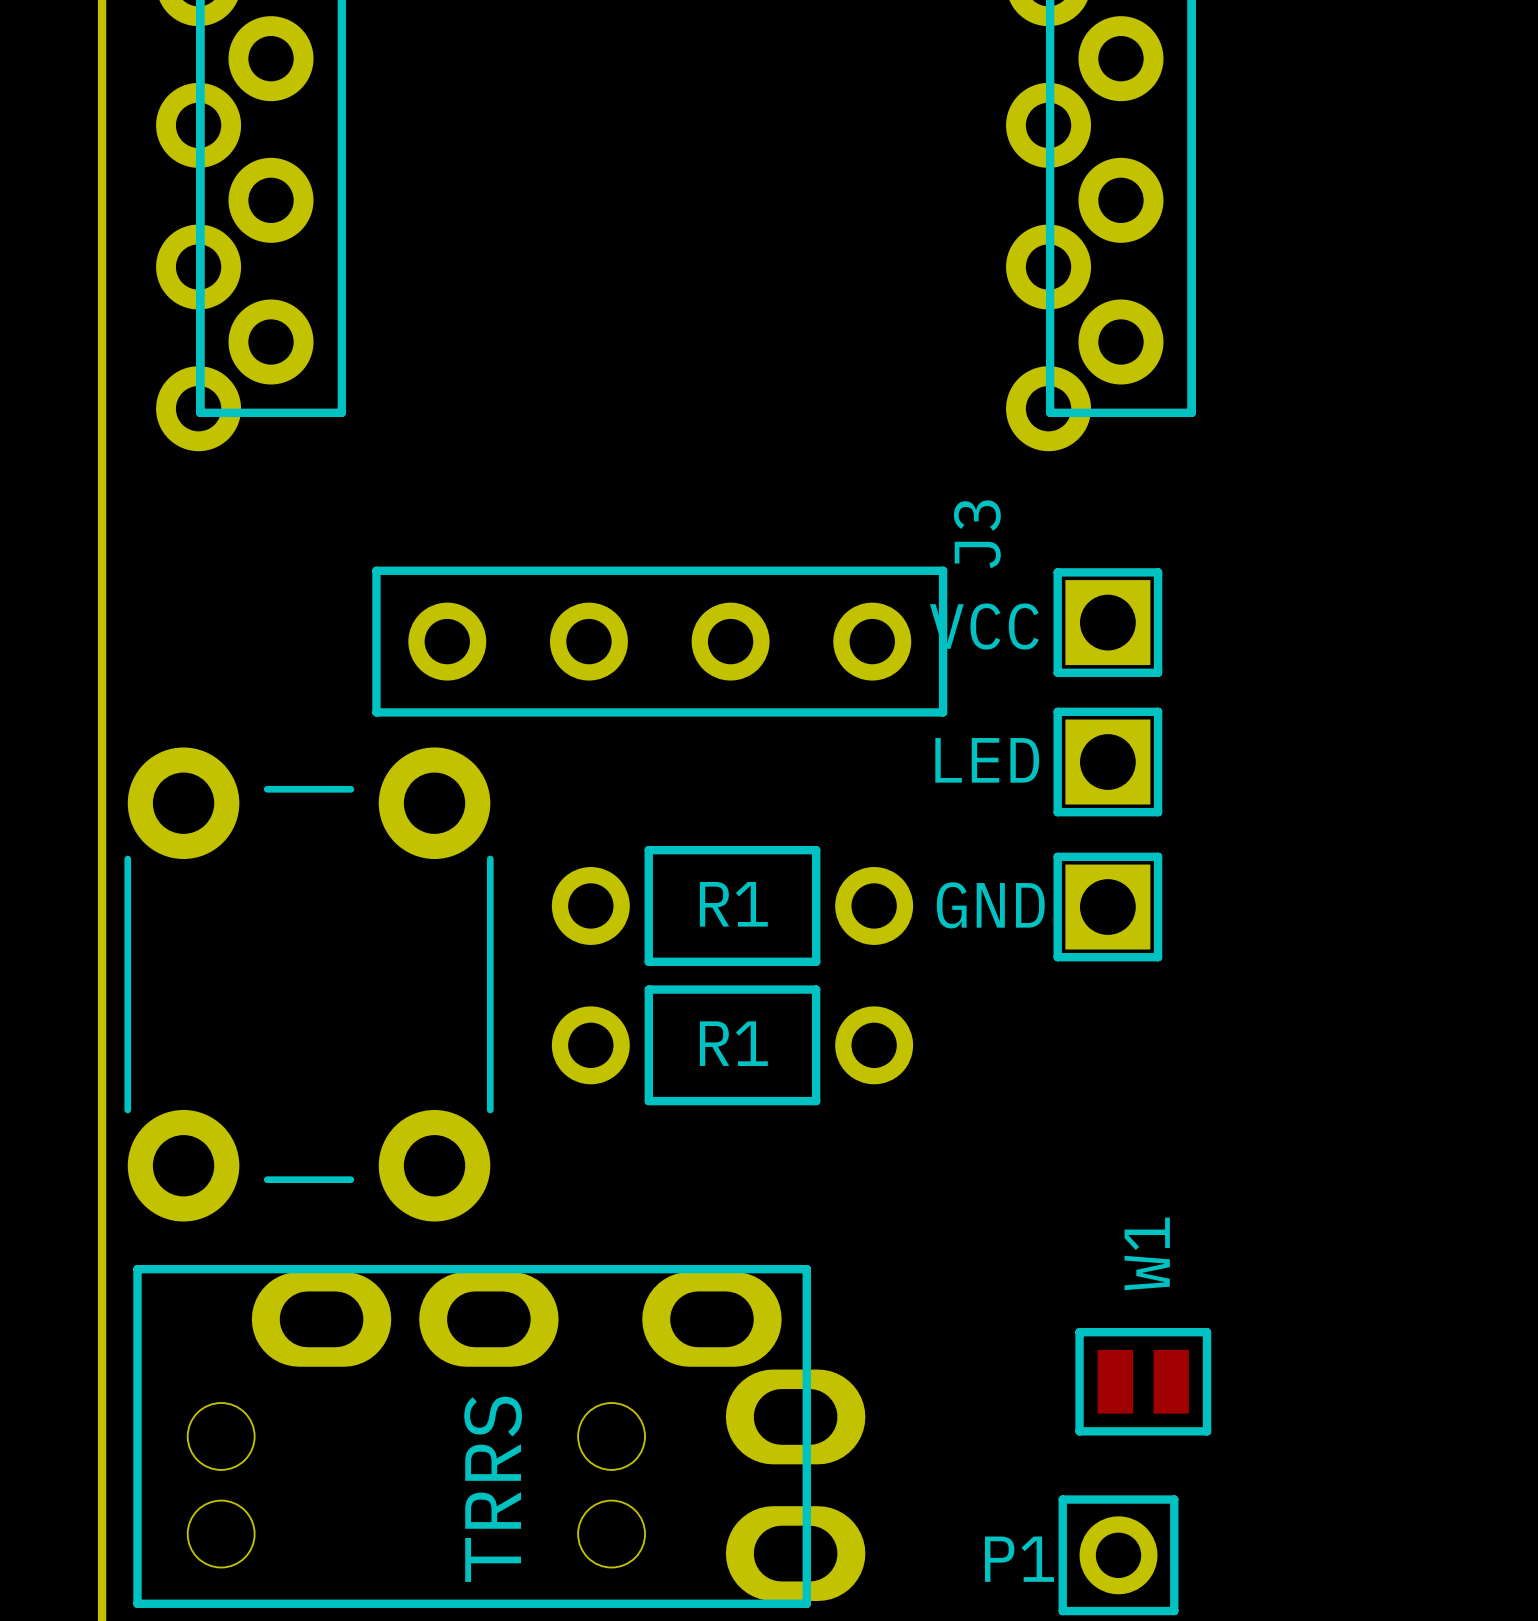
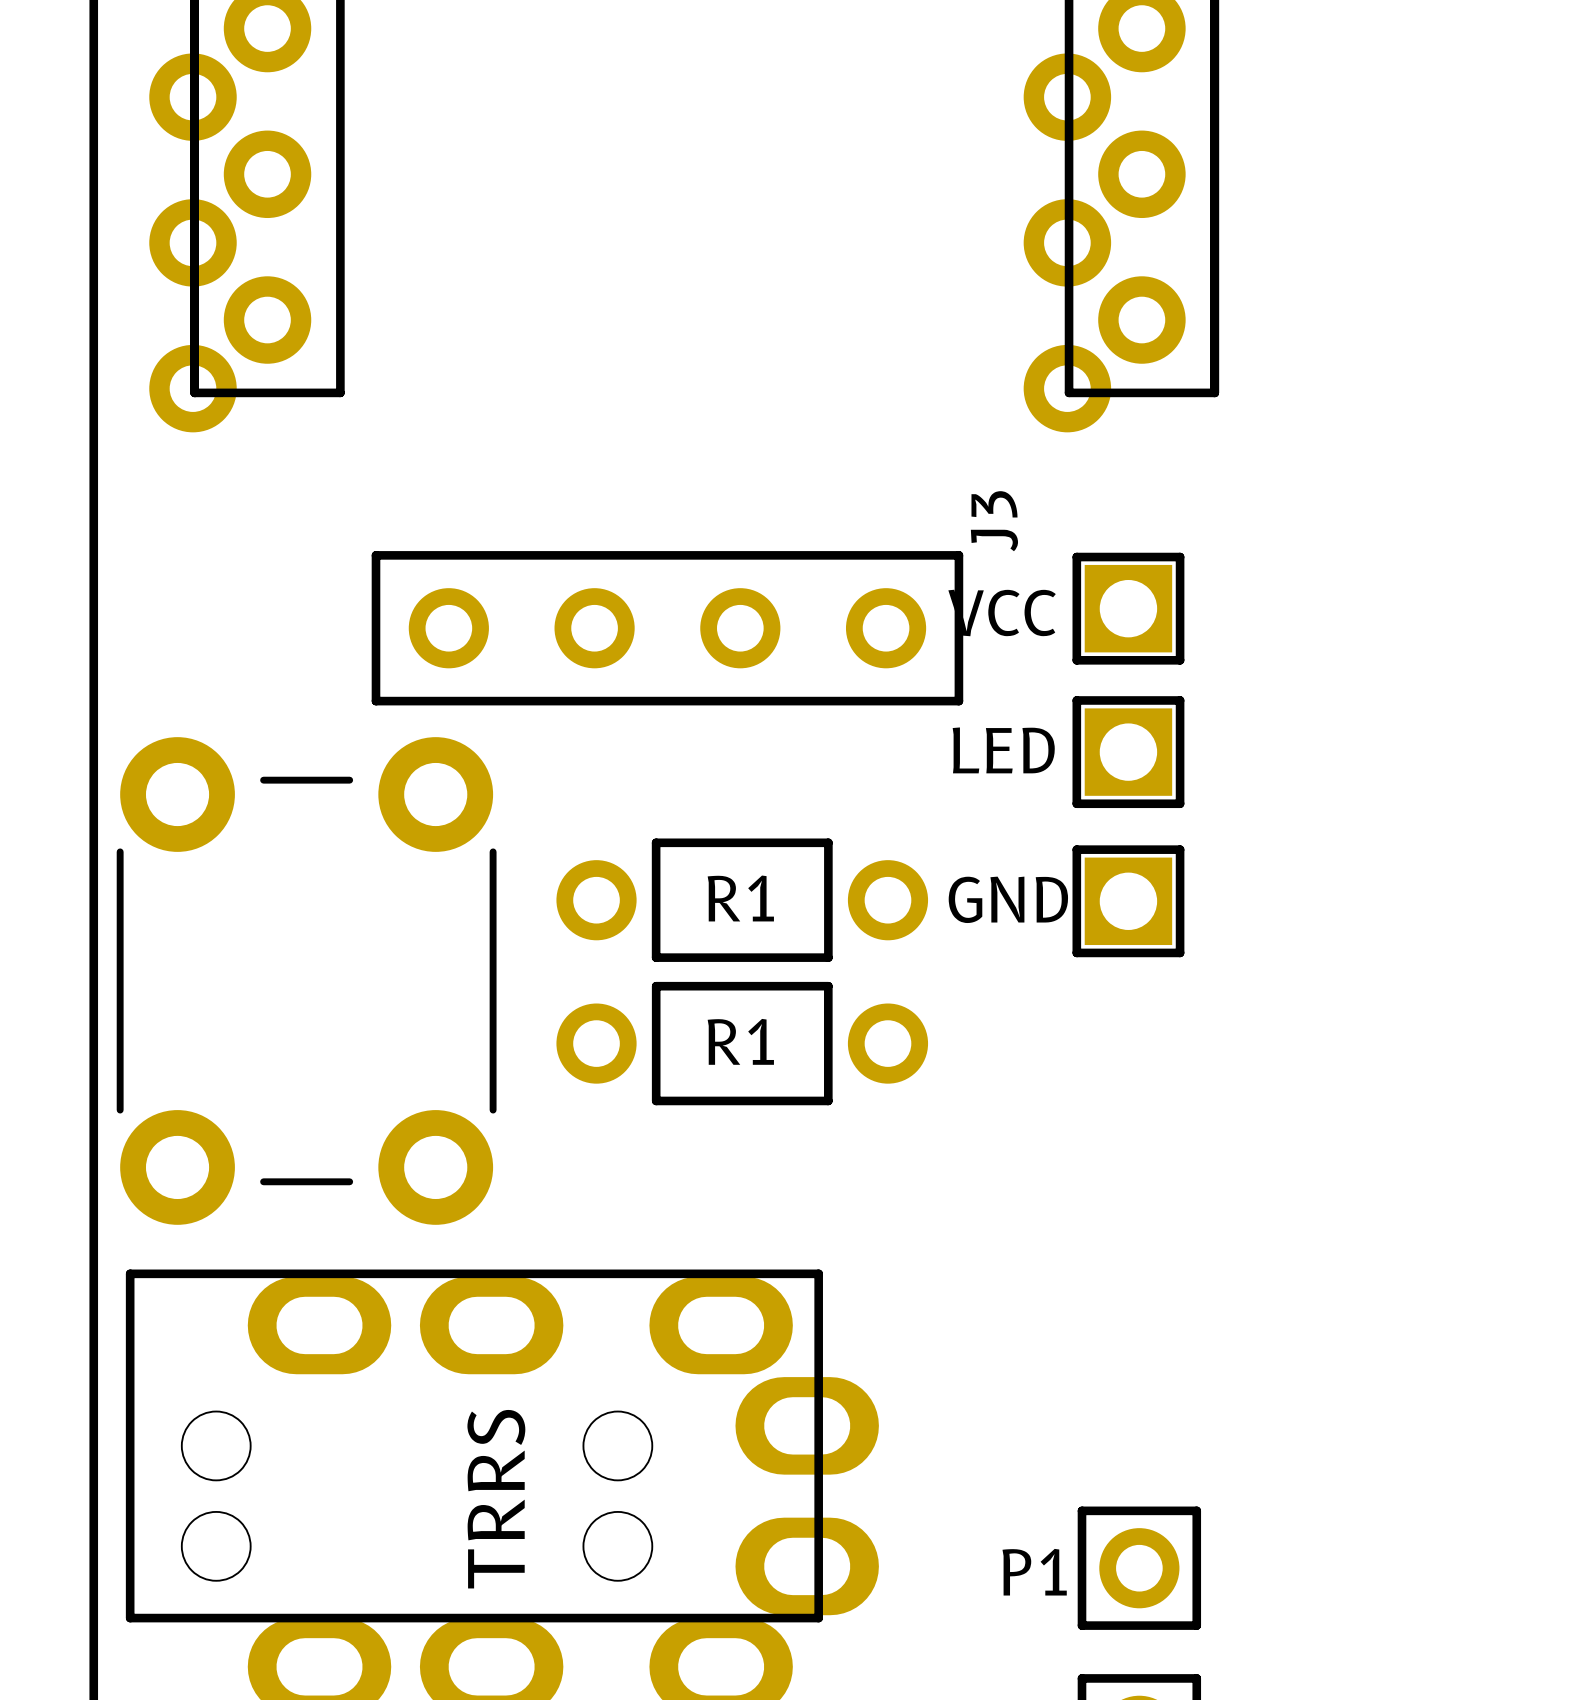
W1: (1143, 1381) -> none

